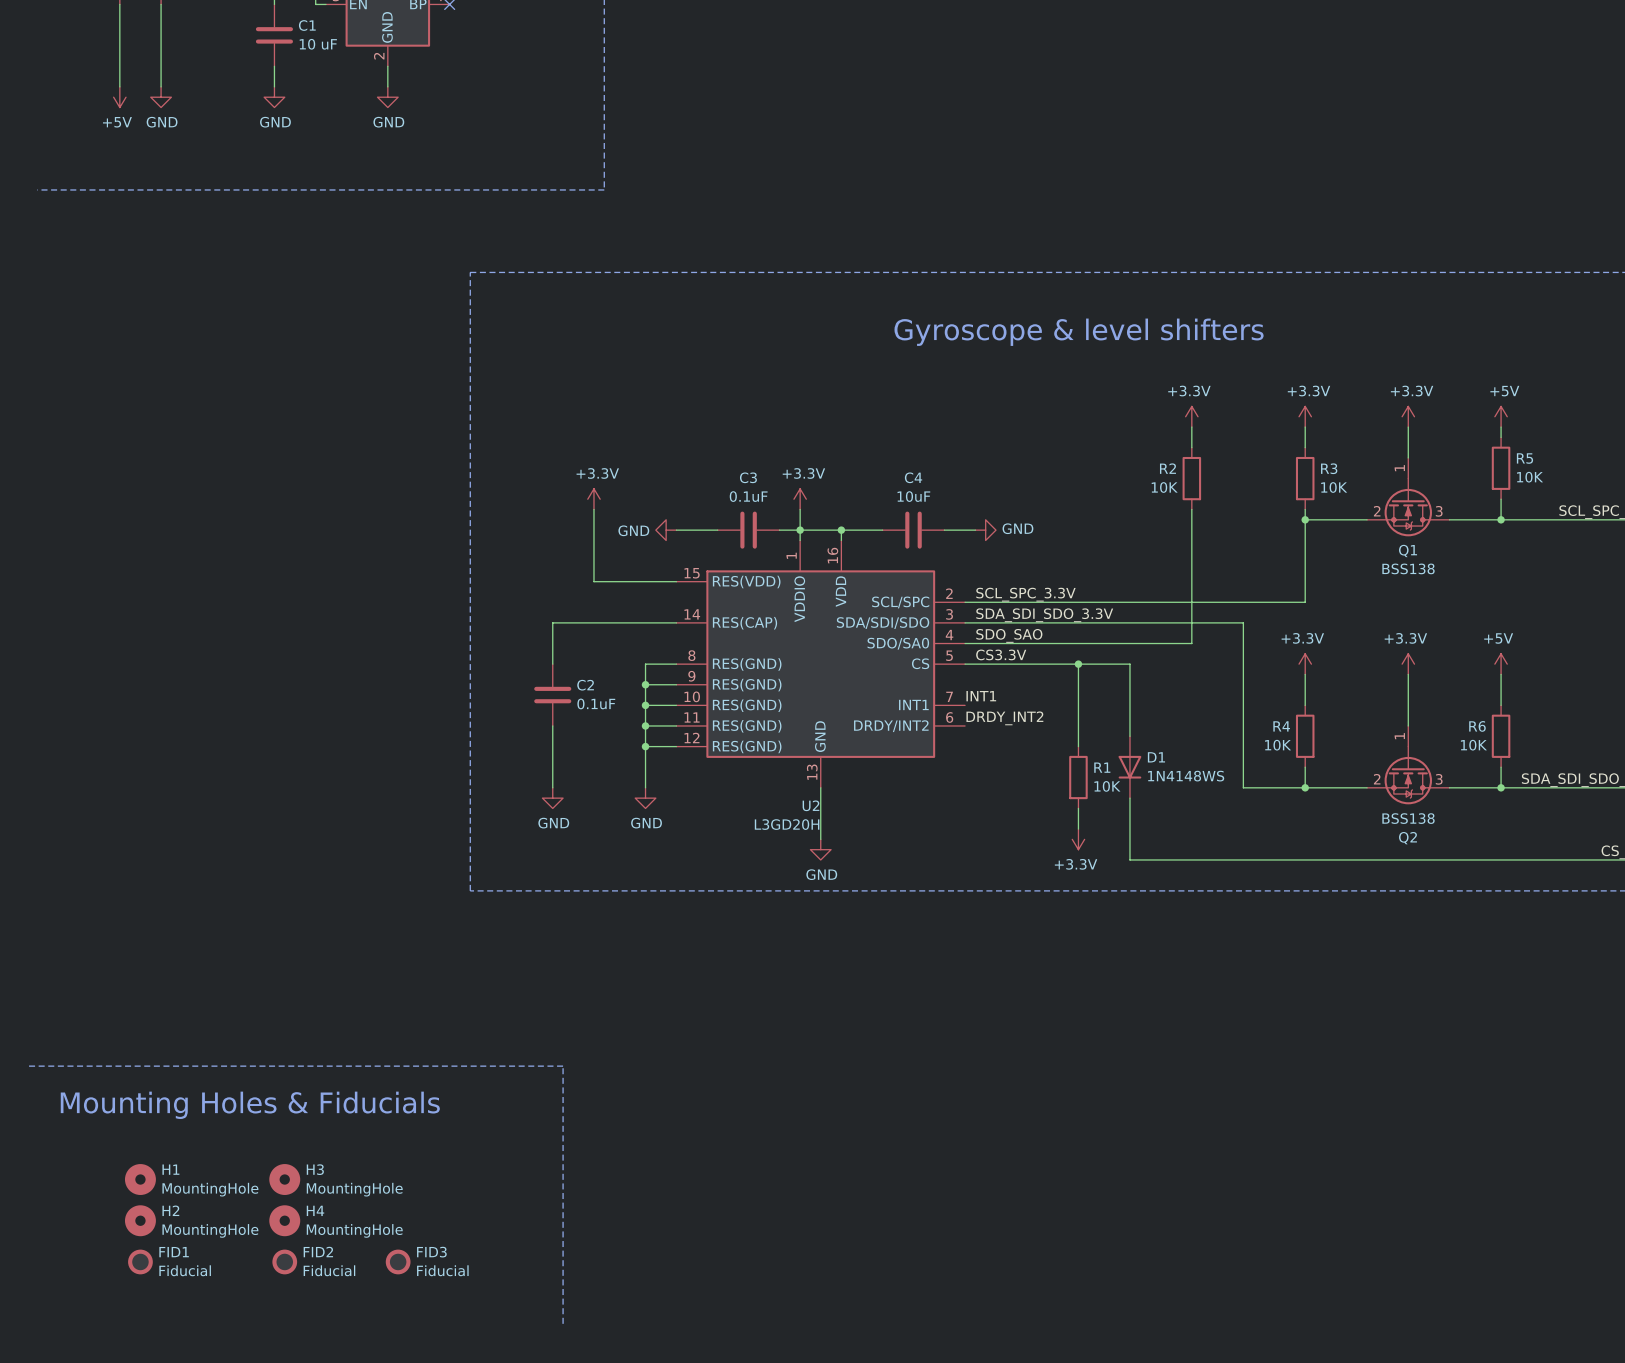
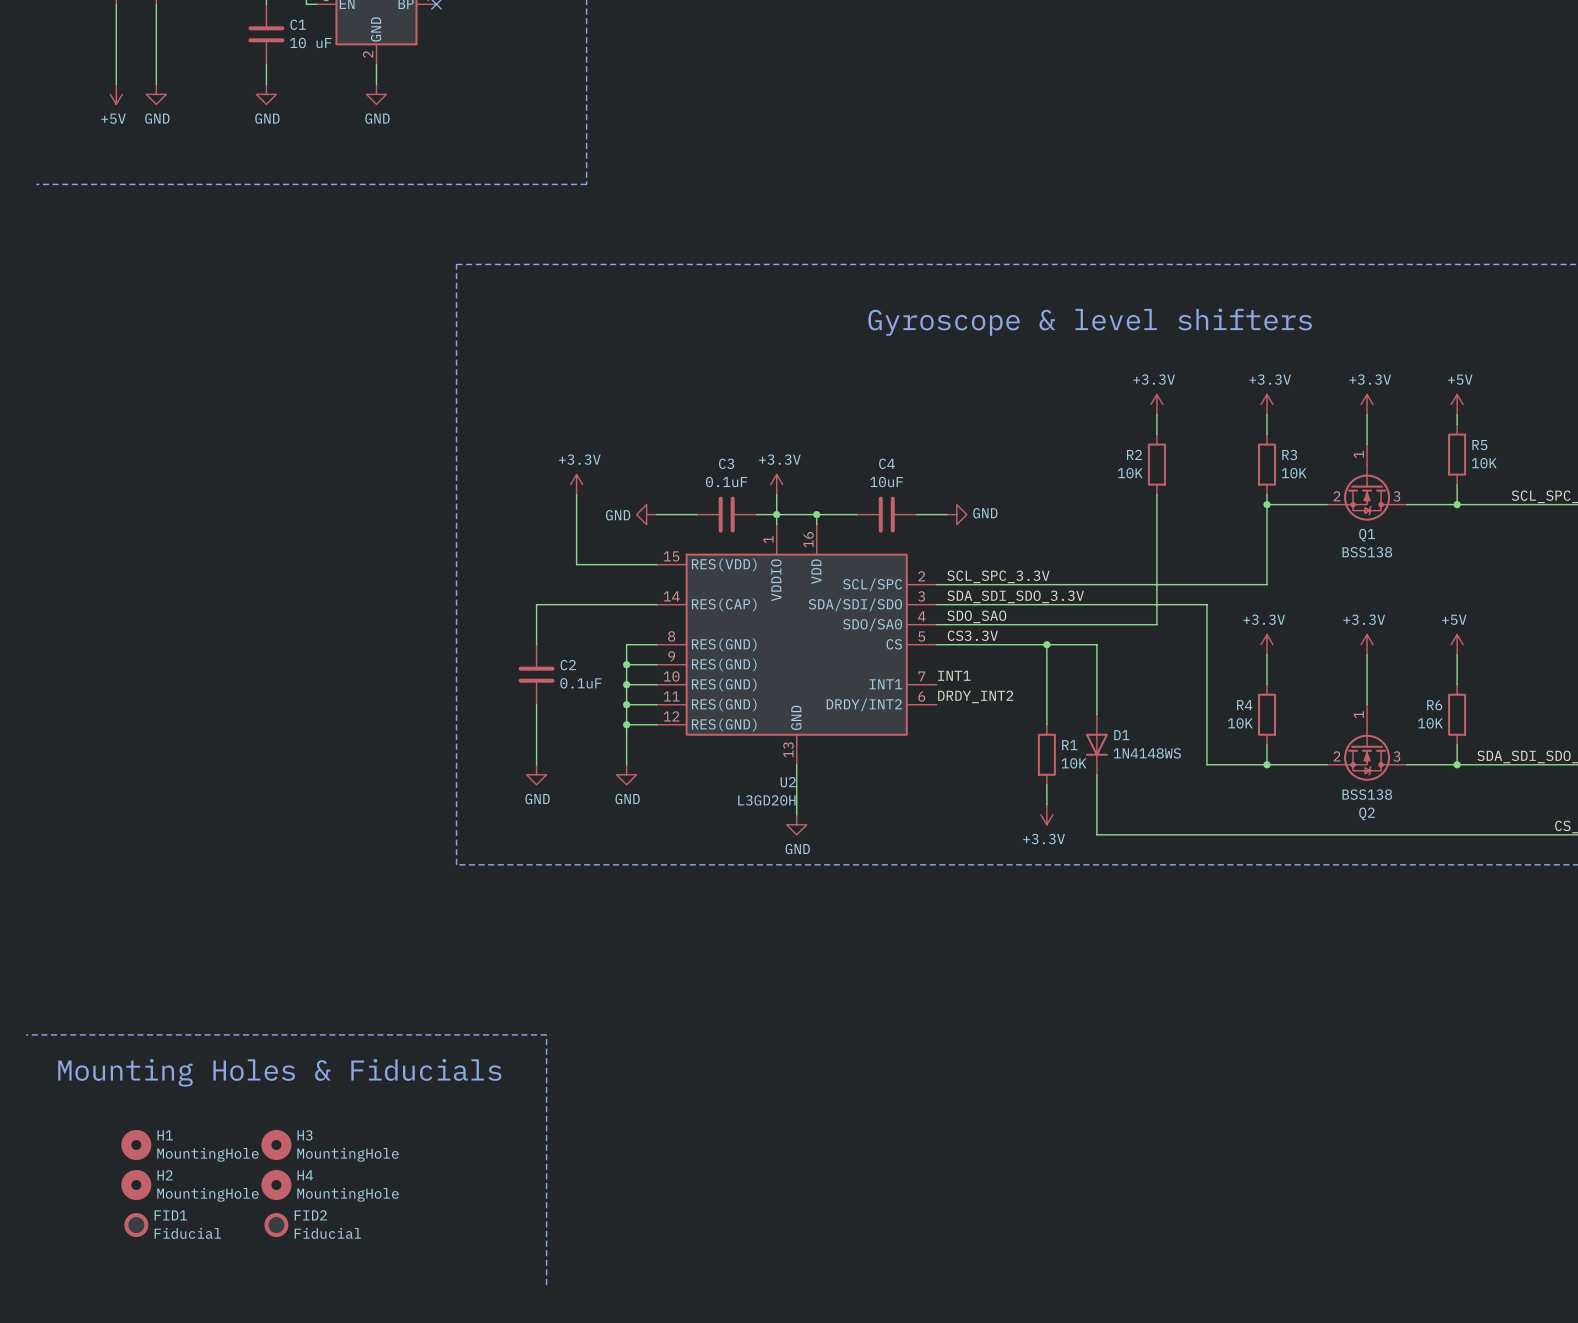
FID3: Fiducial (398, 1261) -> none

